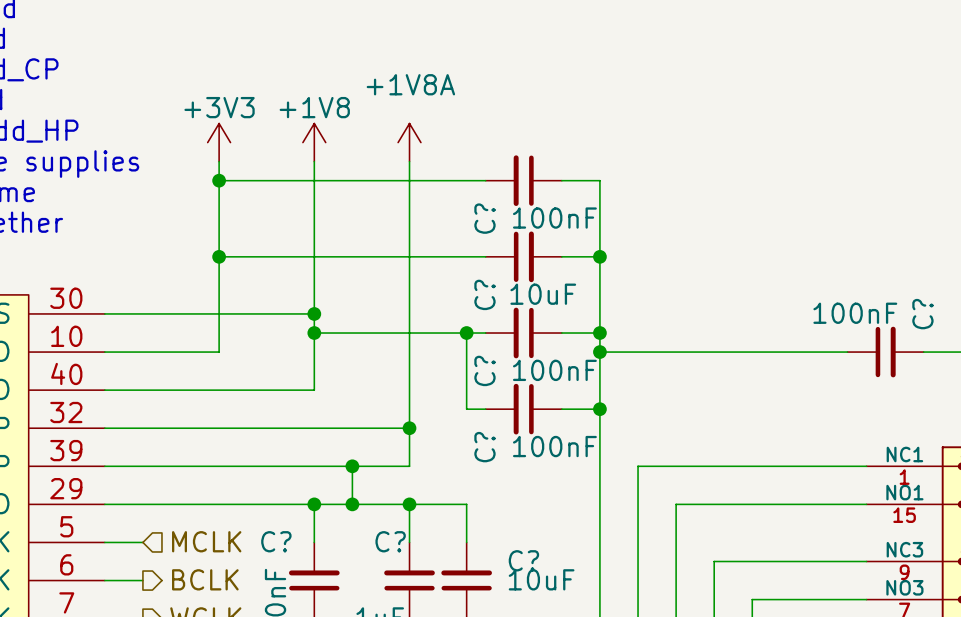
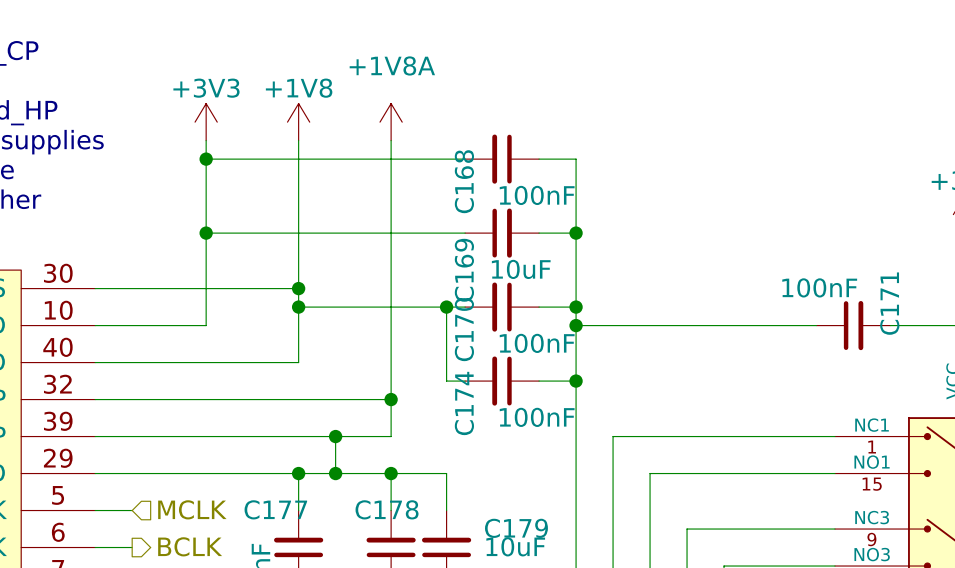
C? name: C? (484, 218) -> C168 (464, 181)
C? name: C? (484, 294) -> C169 (464, 270)
C? name: C? (922, 314) -> C171 (889, 303)
C? name: C? (484, 370) -> C170 (464, 329)
C? name: C? (484, 447) -> C174 (464, 403)
C? name: C? (276, 541) -> C177 (275, 509)
C? name: C? (390, 541) -> C178 (387, 509)
C? name: C? (523, 560) -> C179 (516, 528)

